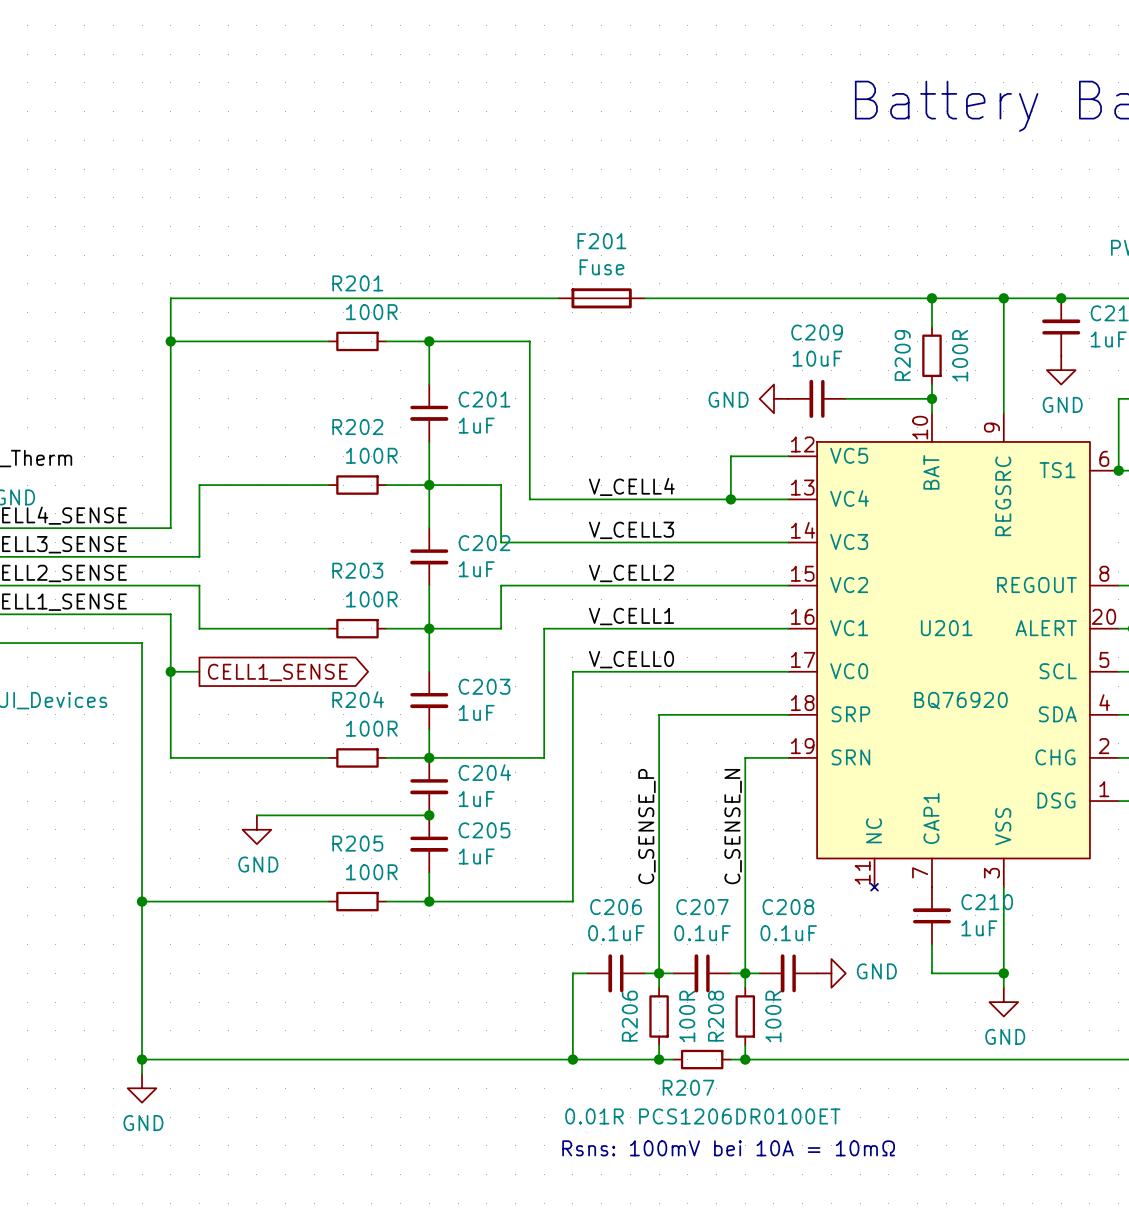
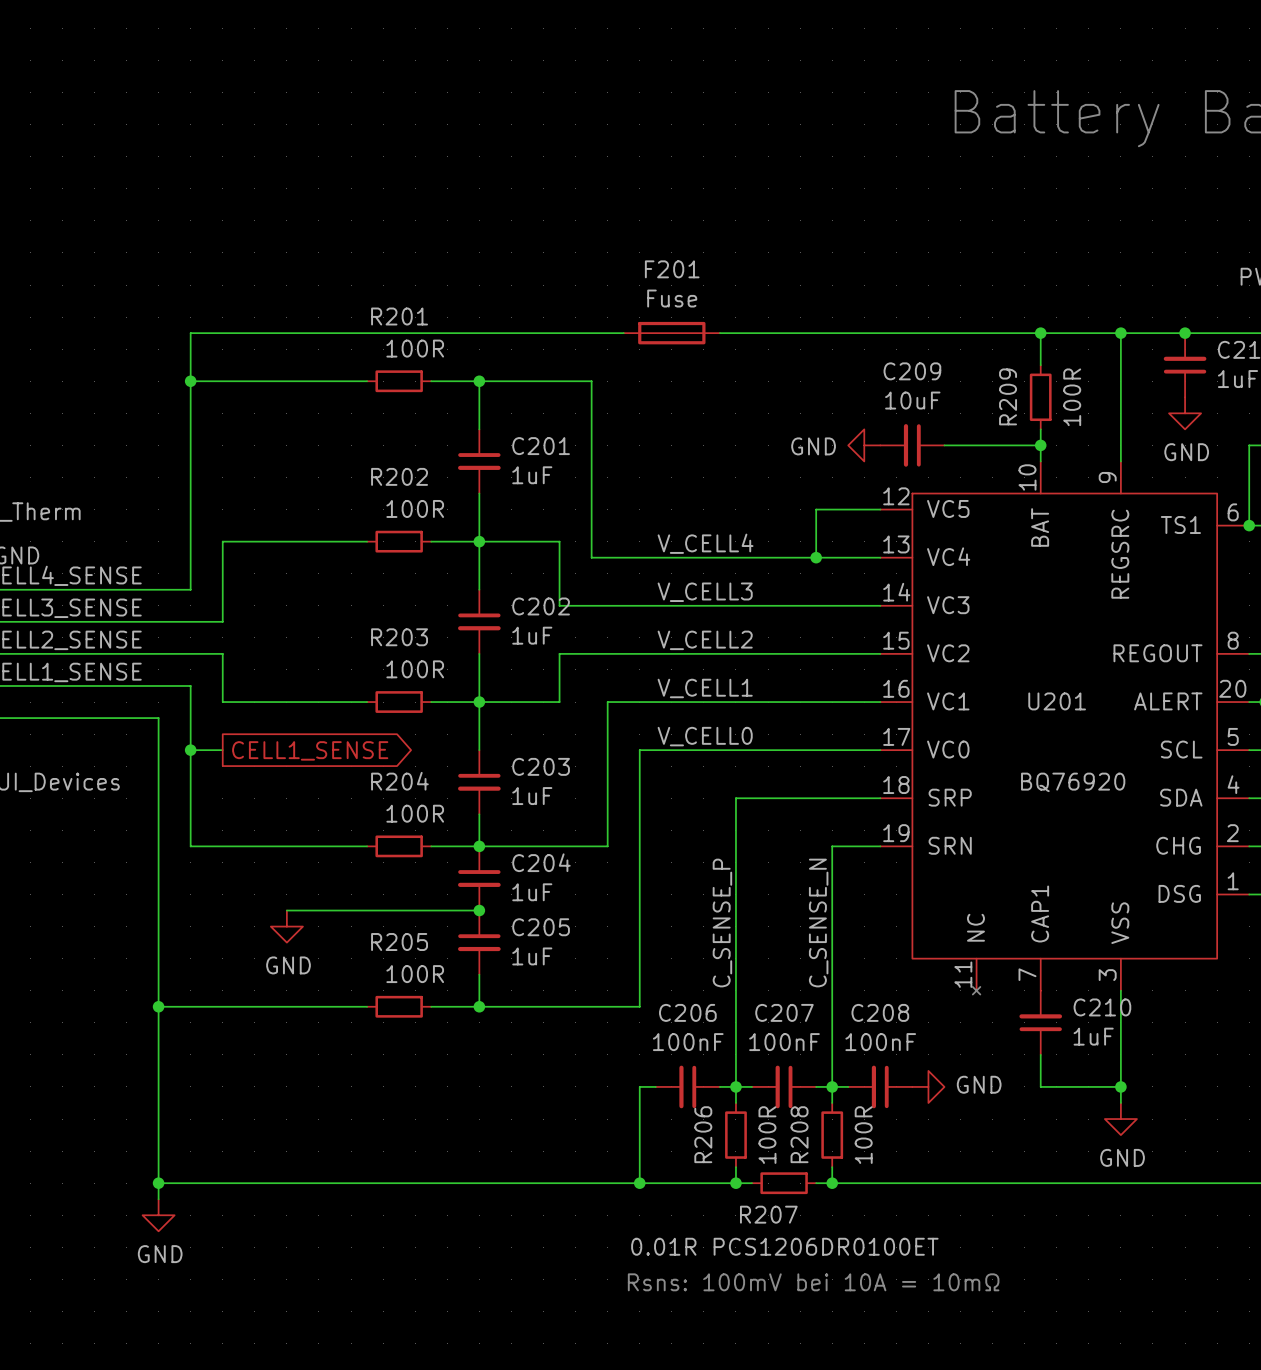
C206 value: 0.1uF (616, 933) -> 100nF (688, 1042)
C207 value: 0.1uF (702, 933) -> 100nF (784, 1042)
C208 value: 0.1uF (788, 933) -> 100nF (880, 1042)

